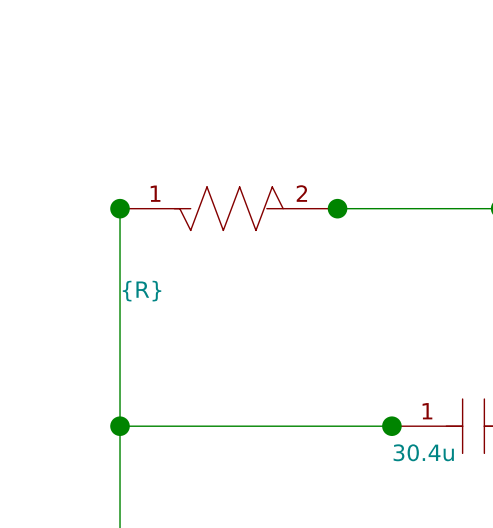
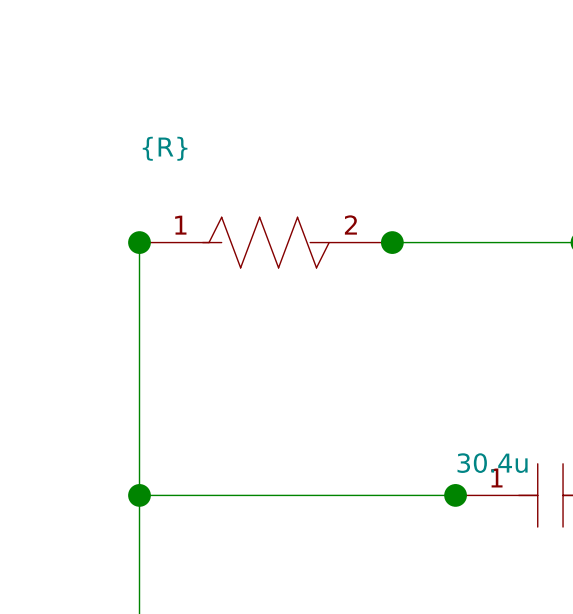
part flip: as is (228, 208) -> up-down (265, 242)
part value position: 30.4u (423, 452) -> 30.4u (492, 463)

